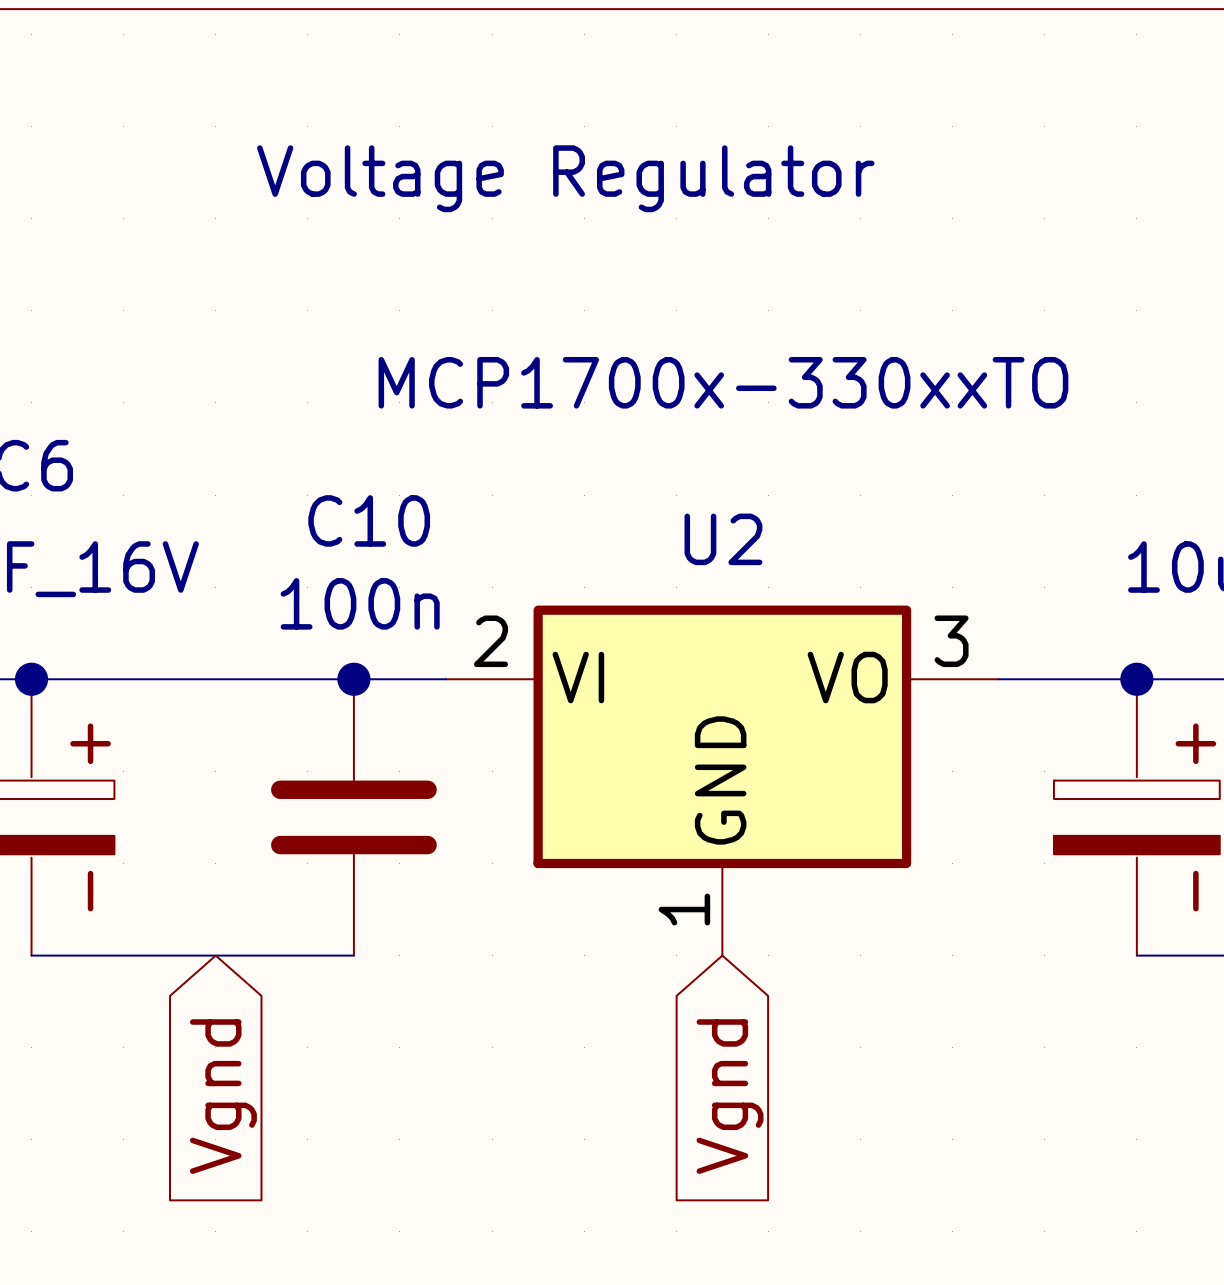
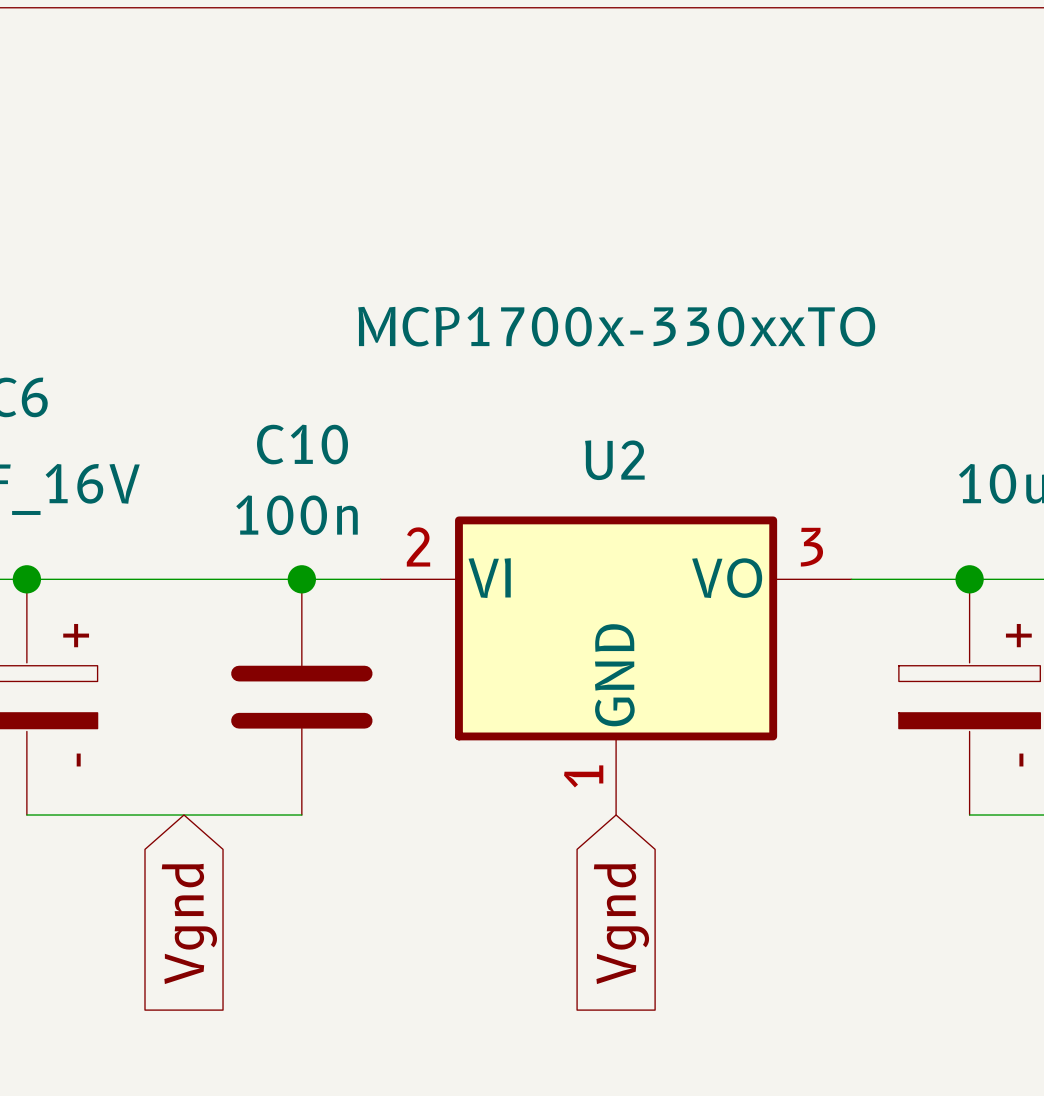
text: Voltage Regulator (565, 178) -> none

